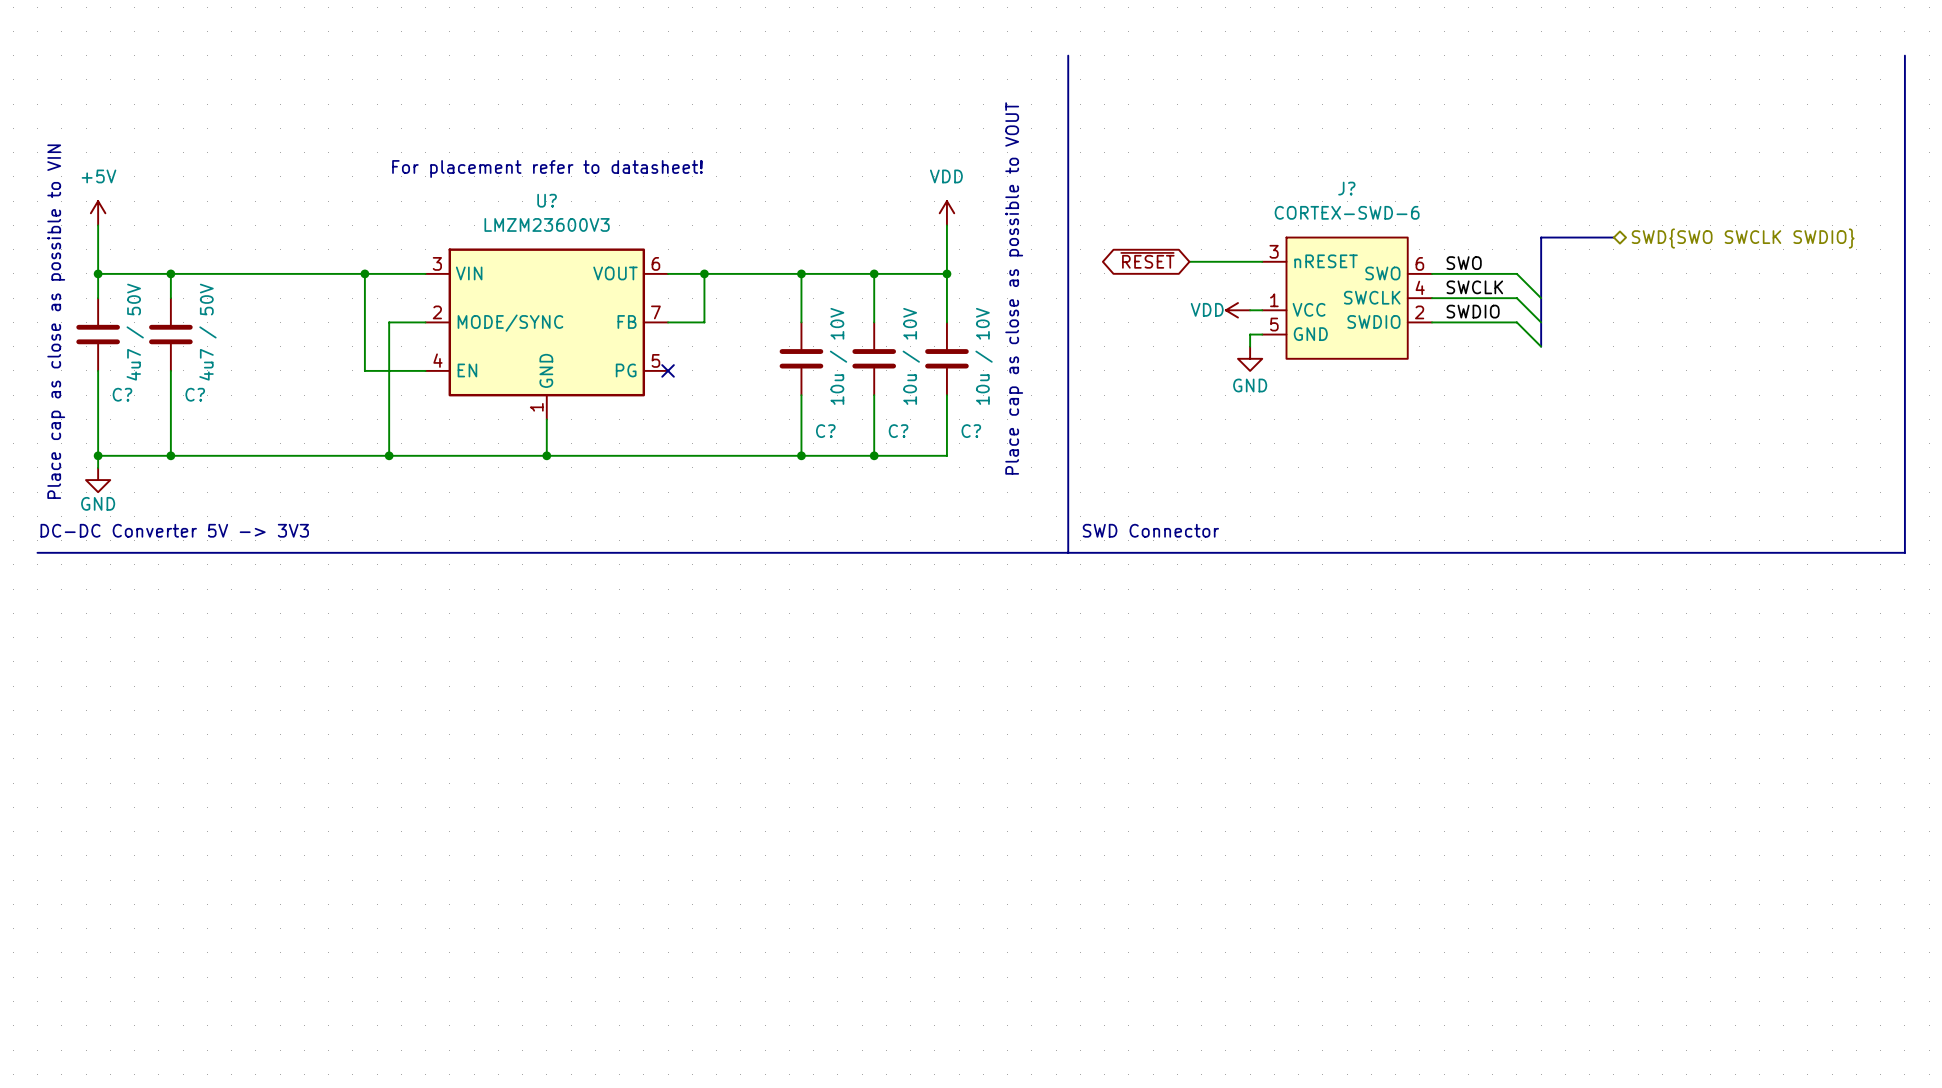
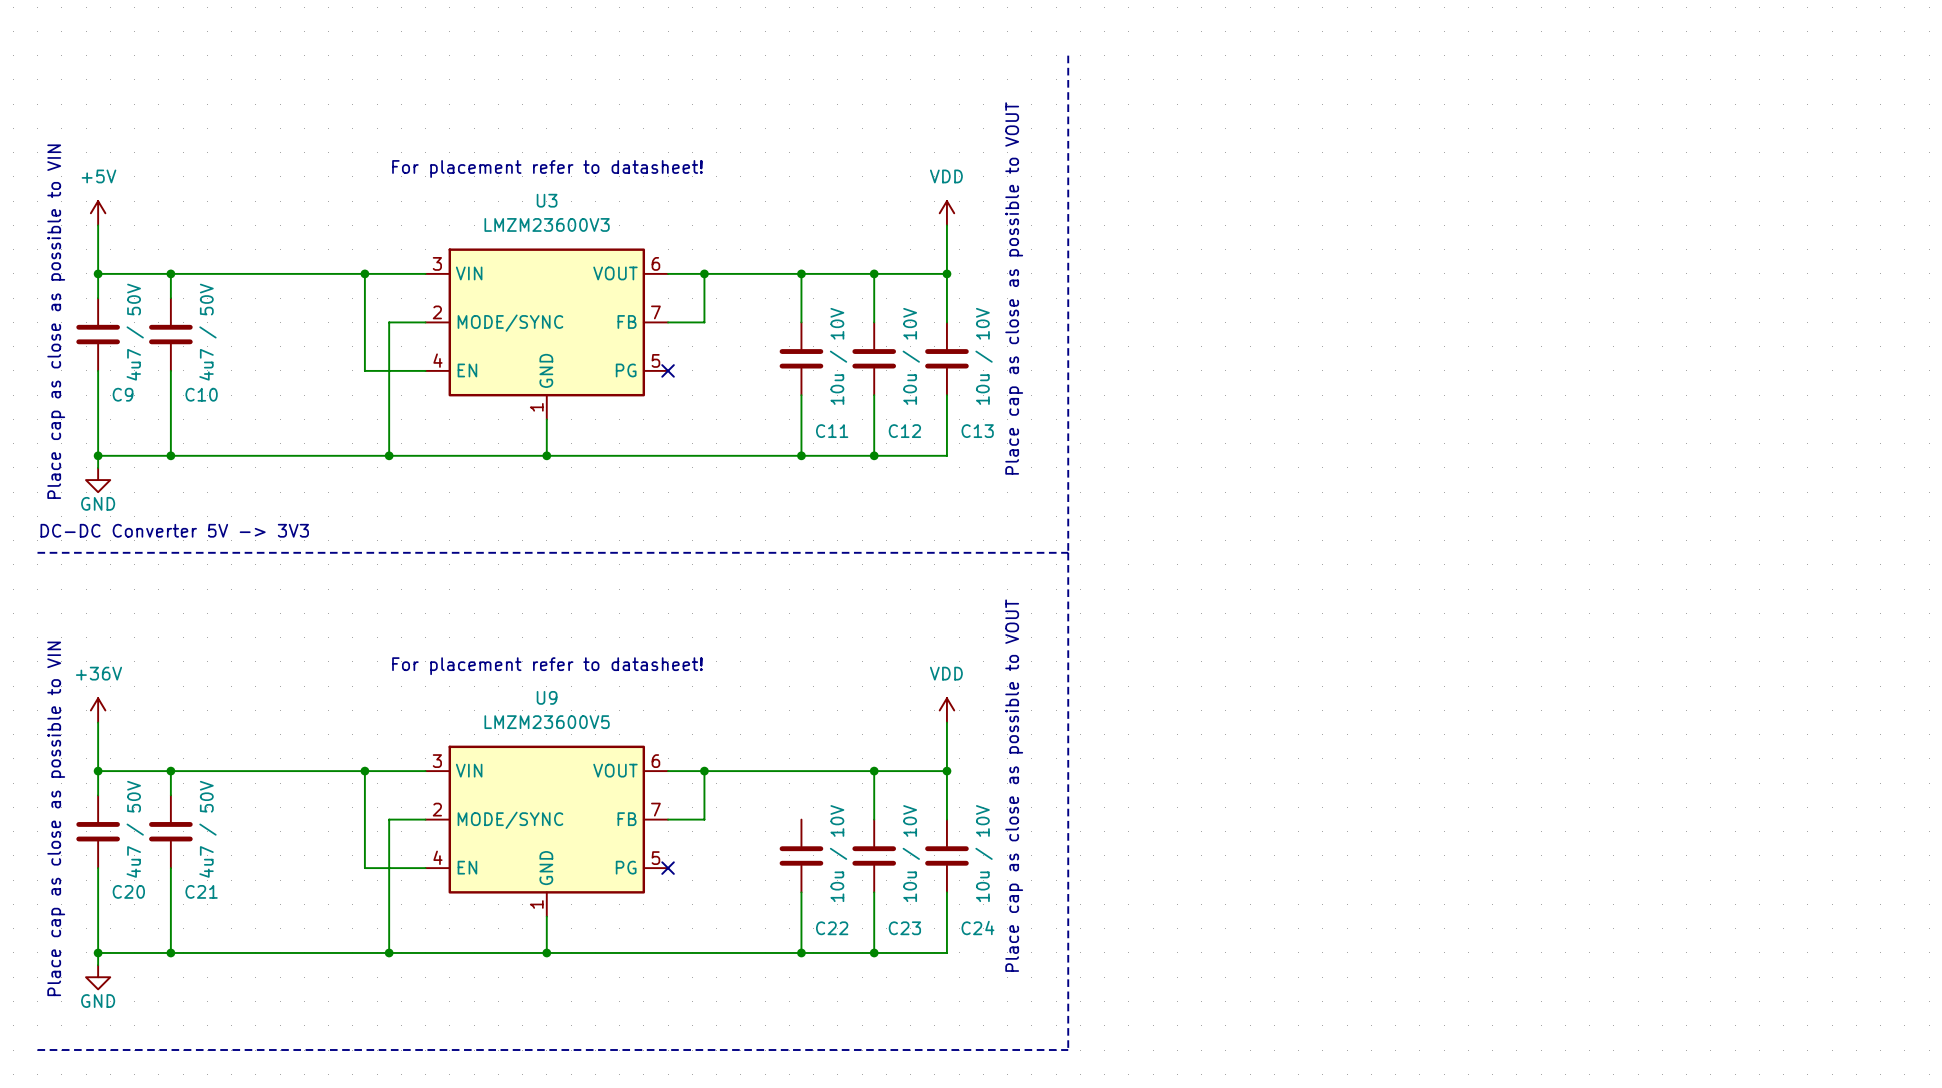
line: (1068, 55) (1068, 552) -> (1068, 55) (1068, 1050) (37, 1050)
line: (1904, 55) (1904, 552) (37, 552) -> (1068, 552) (37, 552)
U? name: U? (547, 200) -> U3 (547, 200)
bus: (1613, 237) (1541, 237) (1541, 346) -> none
hierarchical label: SWD{SWO SWCLK SWDIO} (1743, 238) -> none
global label: ~{RESET} (1147, 260) -> none
wire: (1189, 261) (1262, 261) -> none
label: SWO (1464, 263) -> none
wire: (1432, 273) (1516, 273) (1541, 298) -> none
label: SWCLK (1474, 287) -> none
J?: CORTEX-SWD-6 (1347, 298) -> none
wire: (1432, 298) (1516, 298) (1541, 322) -> none
power symbol: VDD (1237, 310) -> none
wire: (1250, 310) (1262, 310) -> none
label: SWDIO (1473, 311) -> none
wire: (1432, 322) (1516, 322) (1541, 346) -> none
wire: (1262, 334) (1250, 334) (1250, 346) -> none
power symbol: GND (1250, 358) -> none
C? name: C? (122, 394) -> C9 (123, 394)
C? name: C? (195, 394) -> C10 (201, 394)
C? name: C? (825, 431) -> C11 (832, 431)
C? name: C? (898, 431) -> C12 (904, 431)
C? name: C? (971, 431) -> C13 (977, 431)
text: SWD Connector (1150, 530) -> none
text: none -> For placement refer to datasheet! (547, 666)
power symbol: none -> +36V (98, 710)
power symbol: none -> VDD (946, 710)
wire: none -> (98, 722) (98, 795)
wire: none -> (946, 722) (946, 819)
wire: none -> (98, 771) (425, 771)
junction: none -> (98, 771)
wire: none -> (170, 771) (170, 795)
junction: none -> (170, 771)
wire: none -> (364, 771) (364, 868) (425, 868)
junction: none -> (364, 771)
wire: none -> (668, 771) (946, 771)
wire: none -> (704, 771) (704, 819) (668, 819)
junction: none -> (704, 771)
wire: none -> (874, 771) (874, 819)
junction: none -> (874, 771)
junction: none -> (946, 771)
text: none -> Place cap as close as possible to VOUT (1014, 785)
text: none -> Place cap as close as possible to VIN (56, 818)
wire: none -> (425, 819) (389, 819) (389, 952)
C20: none -> 4u7 / 50V (98, 831)
C21: none -> 4u7 / 50V (170, 831)
U9: none -> LMZM23600V5 (546, 831)
C22: none -> 10u / 10V (801, 855)
C23: none -> 10u / 10V (874, 855)
C24: none -> 10u / 10V (946, 855)
wire: none -> (98, 868) (98, 965)
wire: none -> (170, 868) (170, 952)
no-connect mark: none -> (668, 868)
wire: none -> (801, 892) (801, 952)
wire: none -> (874, 892) (874, 952)
wire: none -> (946, 892) (946, 952) (98, 952)
wire: none -> (546, 916) (546, 952)
junction: none -> (98, 952)
junction: none -> (170, 952)
junction: none -> (389, 952)
junction: none -> (546, 952)
junction: none -> (801, 952)
junction: none -> (874, 952)
power symbol: none -> GND (98, 977)

